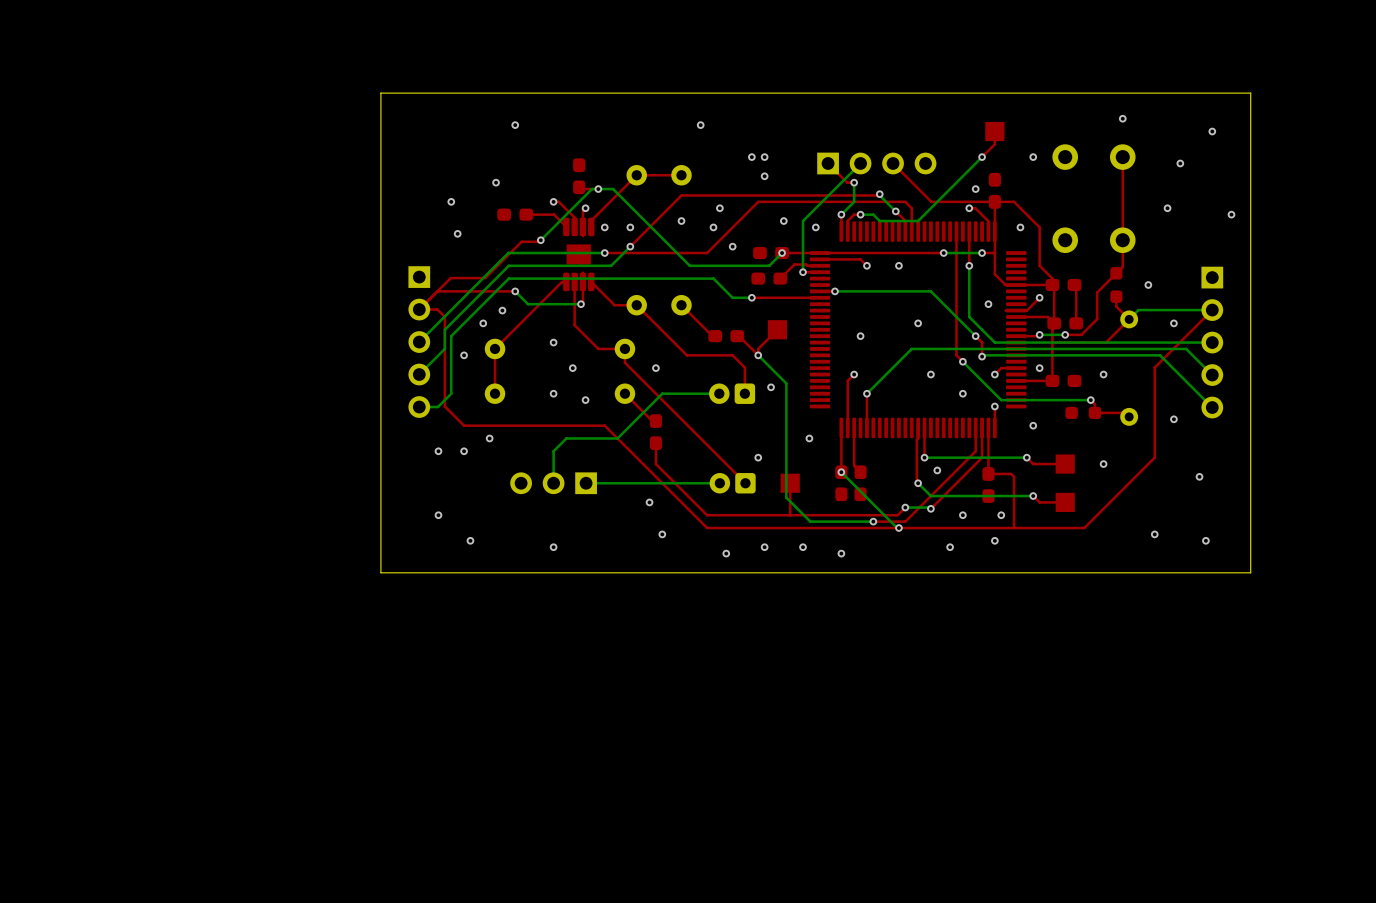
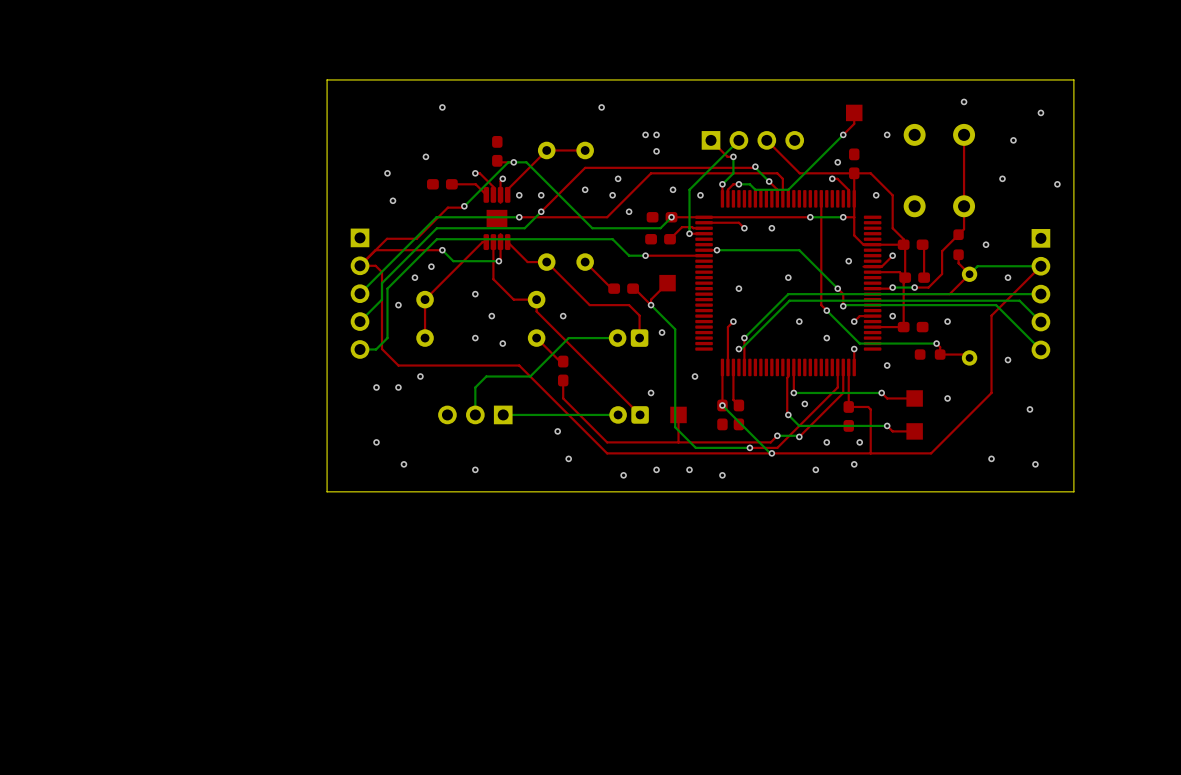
top track: (969, 231) (969, 265) -> none
bottom track: (969, 265) (969, 316) (994, 342) -> (782, 299) (788, 294) (854, 294)
via: (969, 265) -> none
bottom track: (911, 348) (1187, 350) -> (738, 349) (741, 349) (789, 300) (1019, 300)
via: none -> (738, 349)

